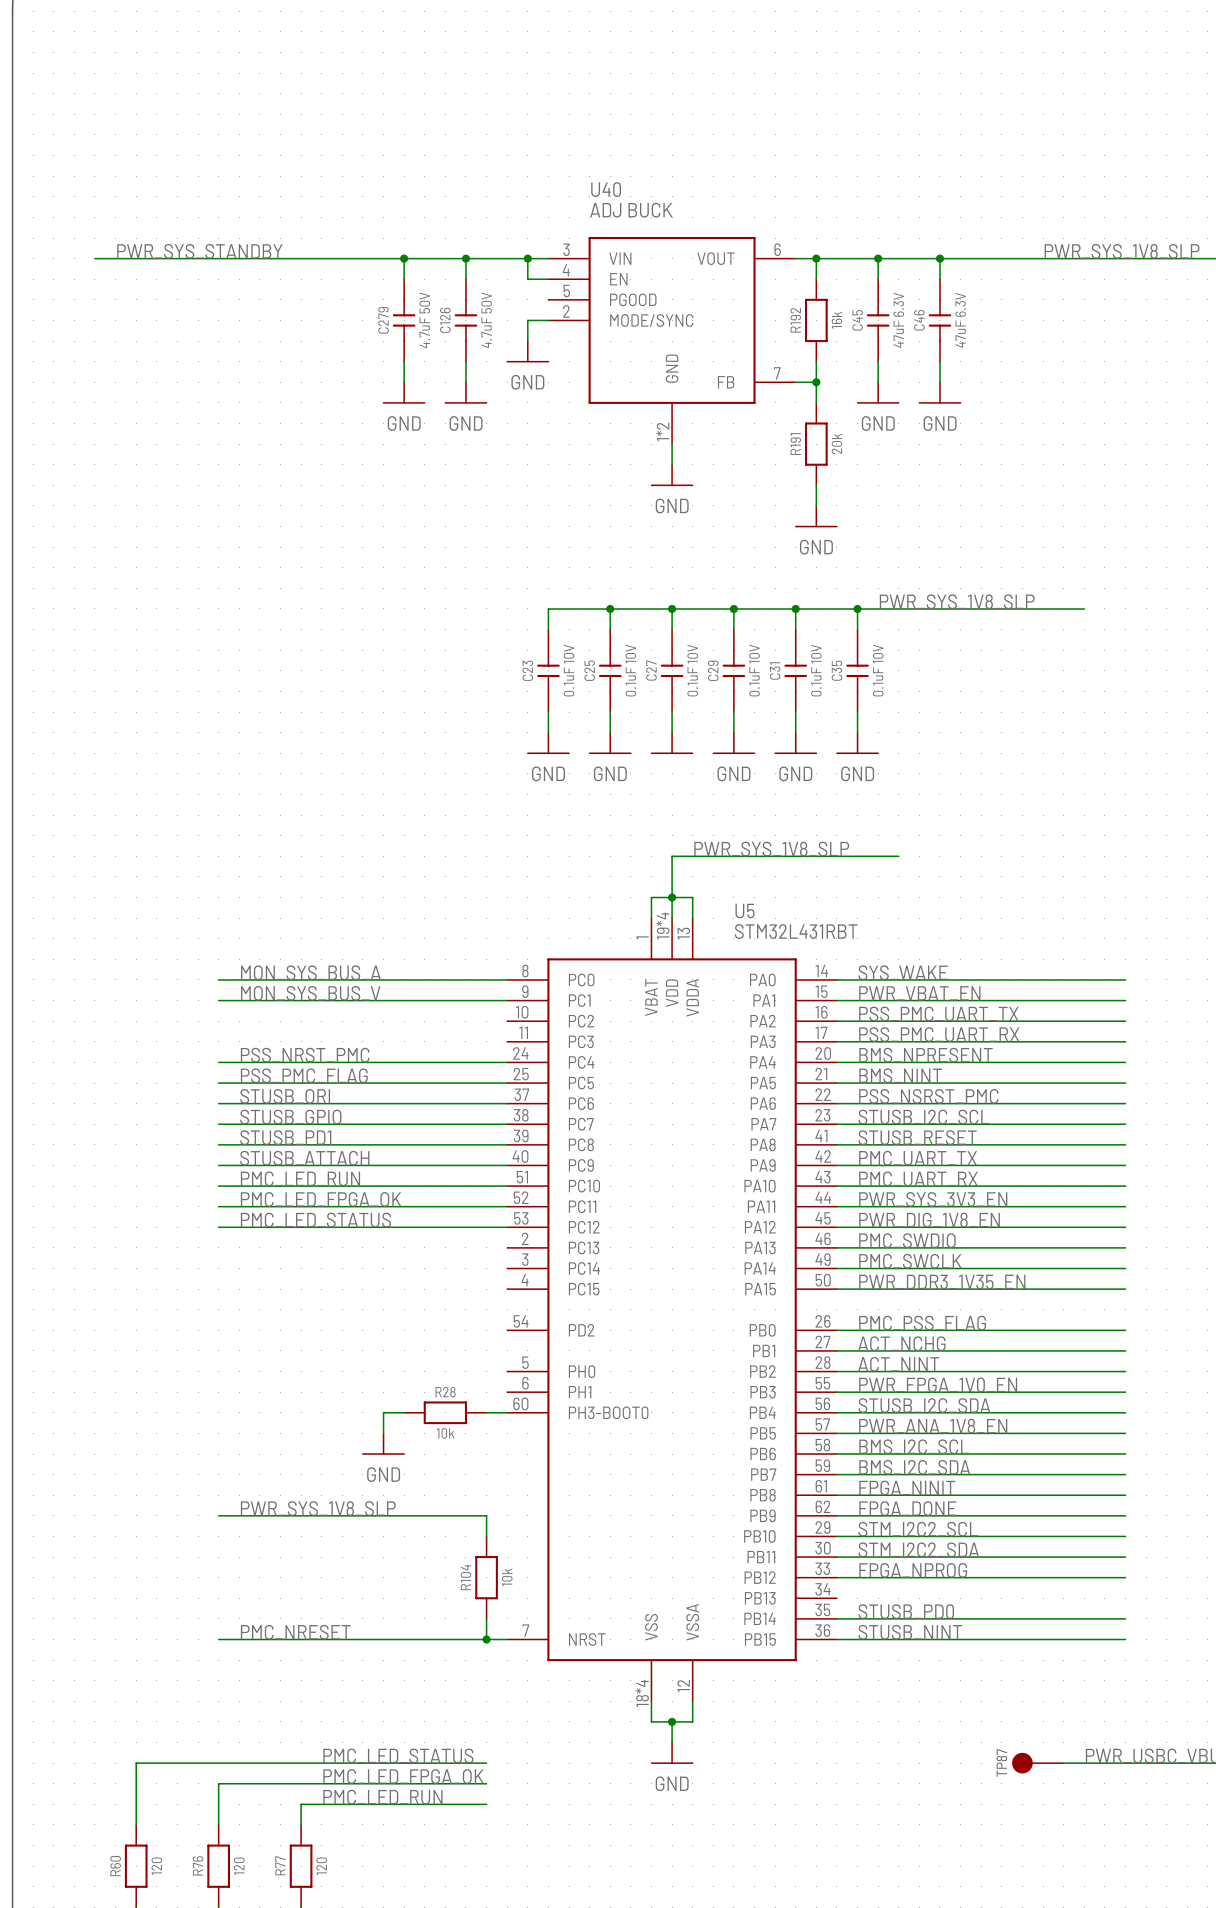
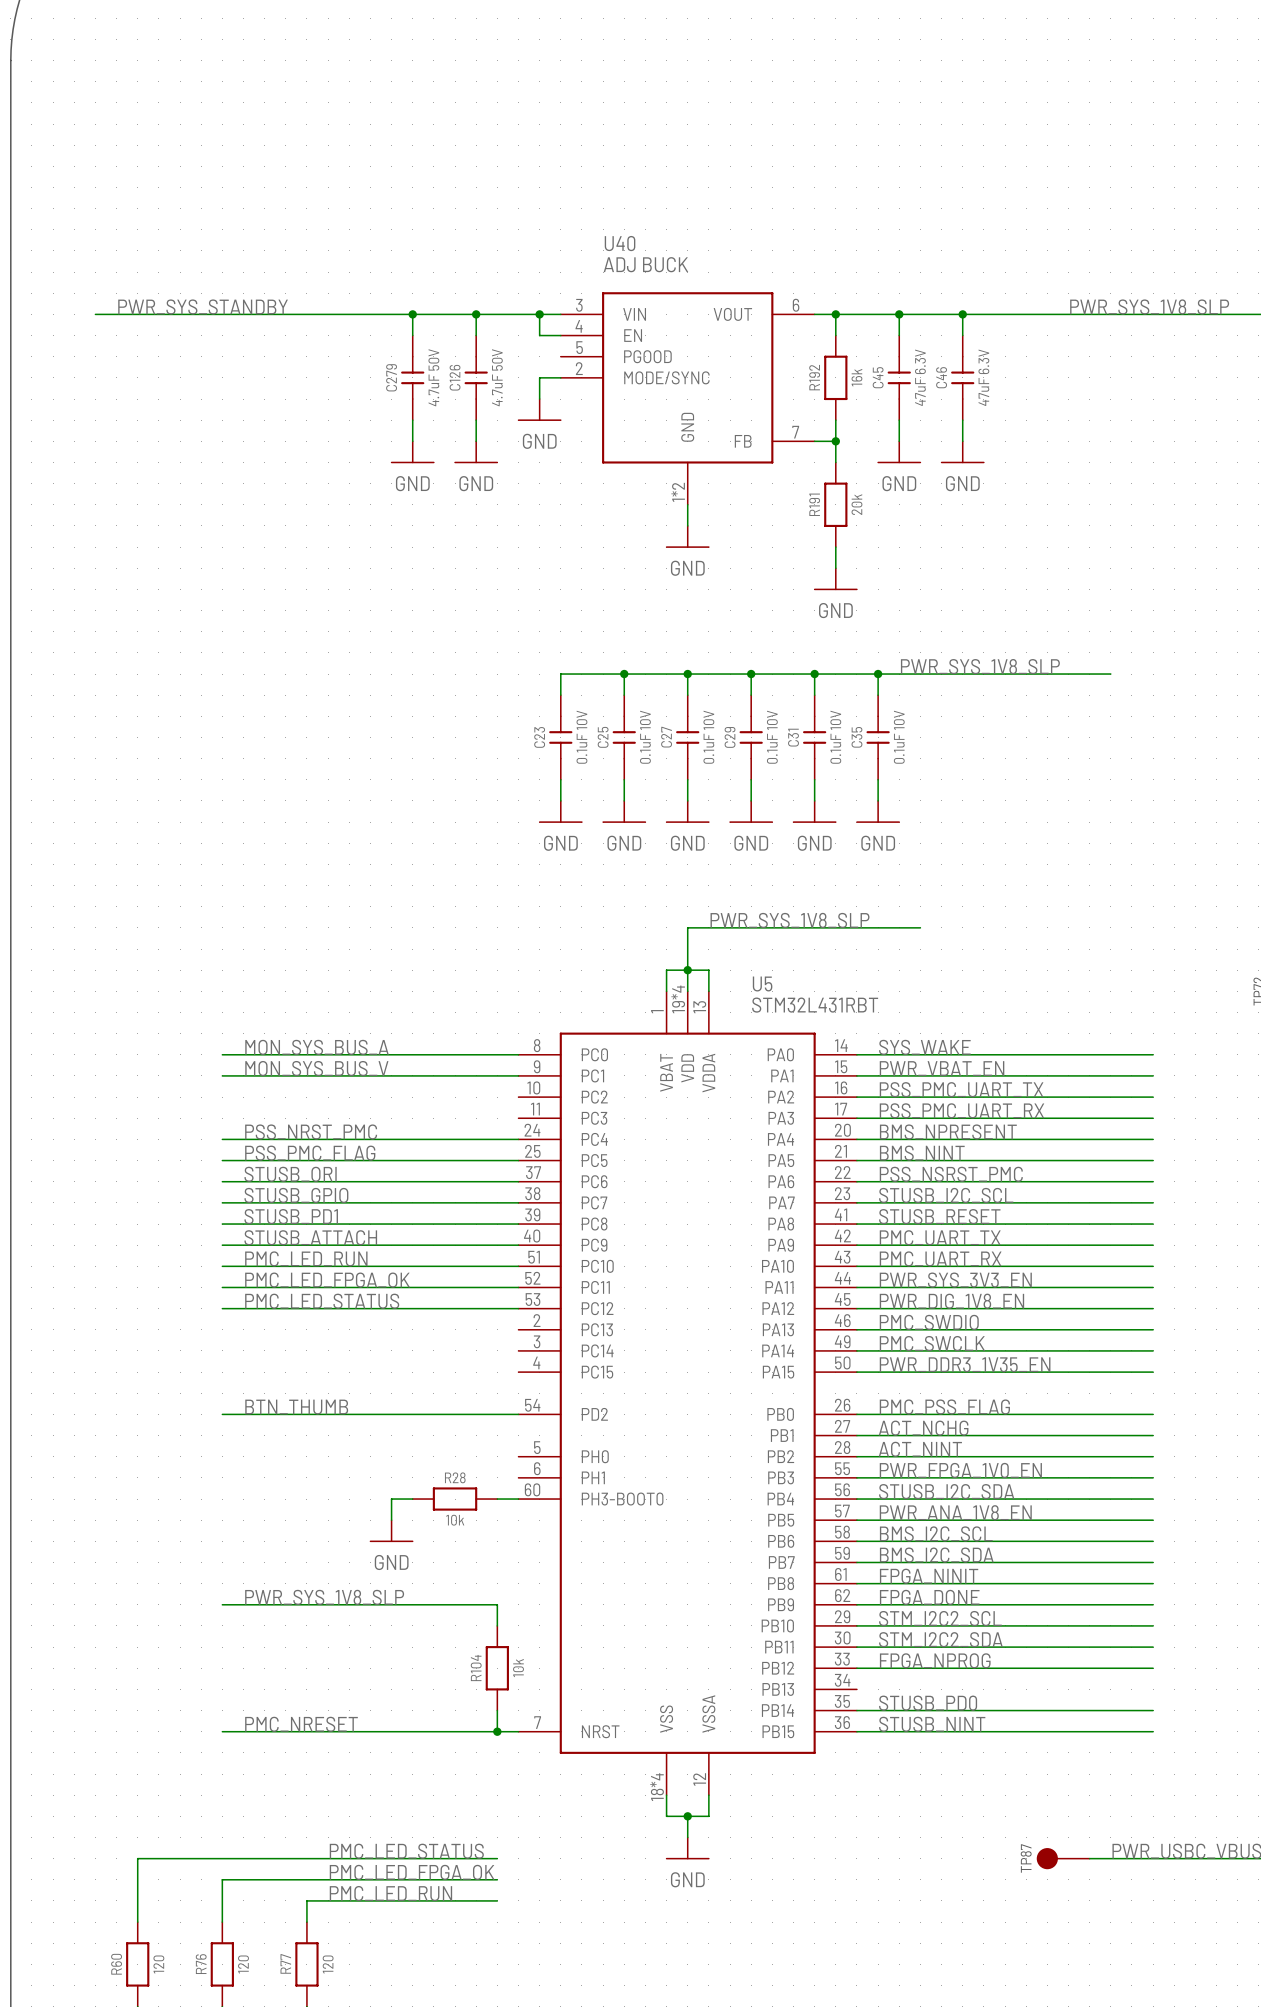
power symbol text: none -> GND (687, 843)
label: none -> BTN_THUMB (296, 1407)
wire: none -> (222, 1414) (518, 1414)

